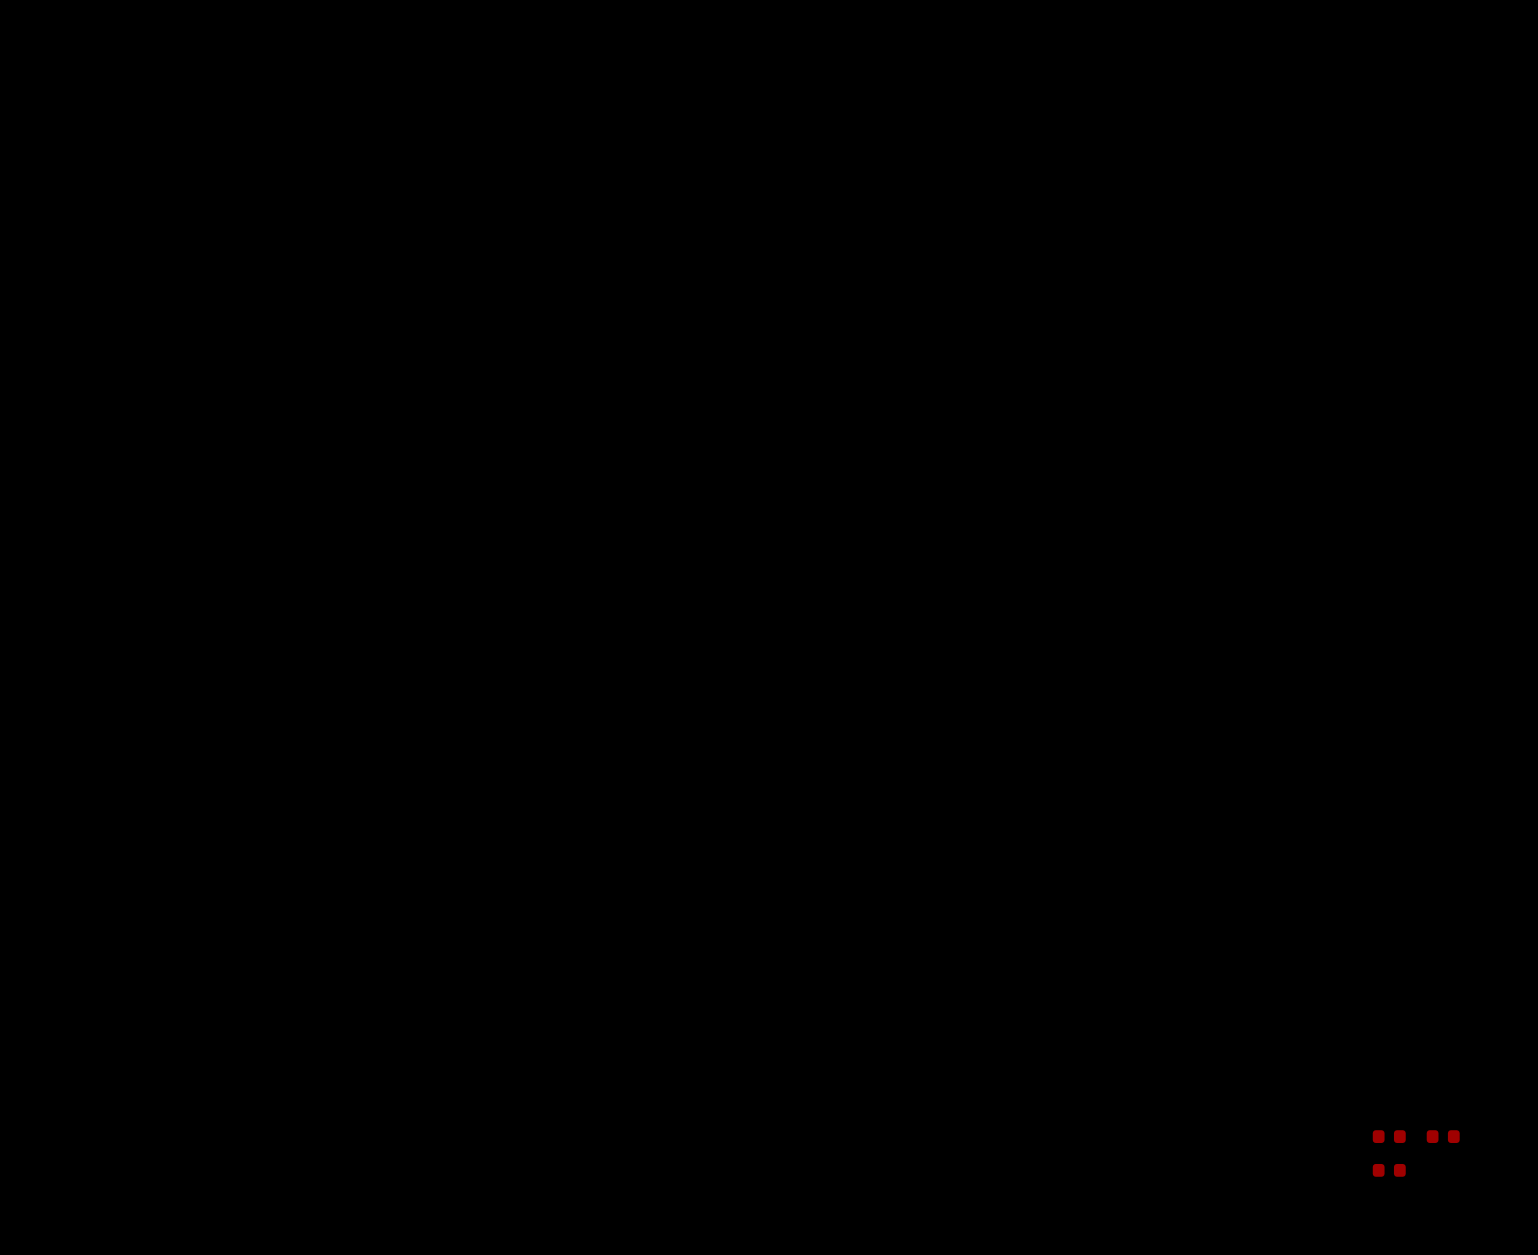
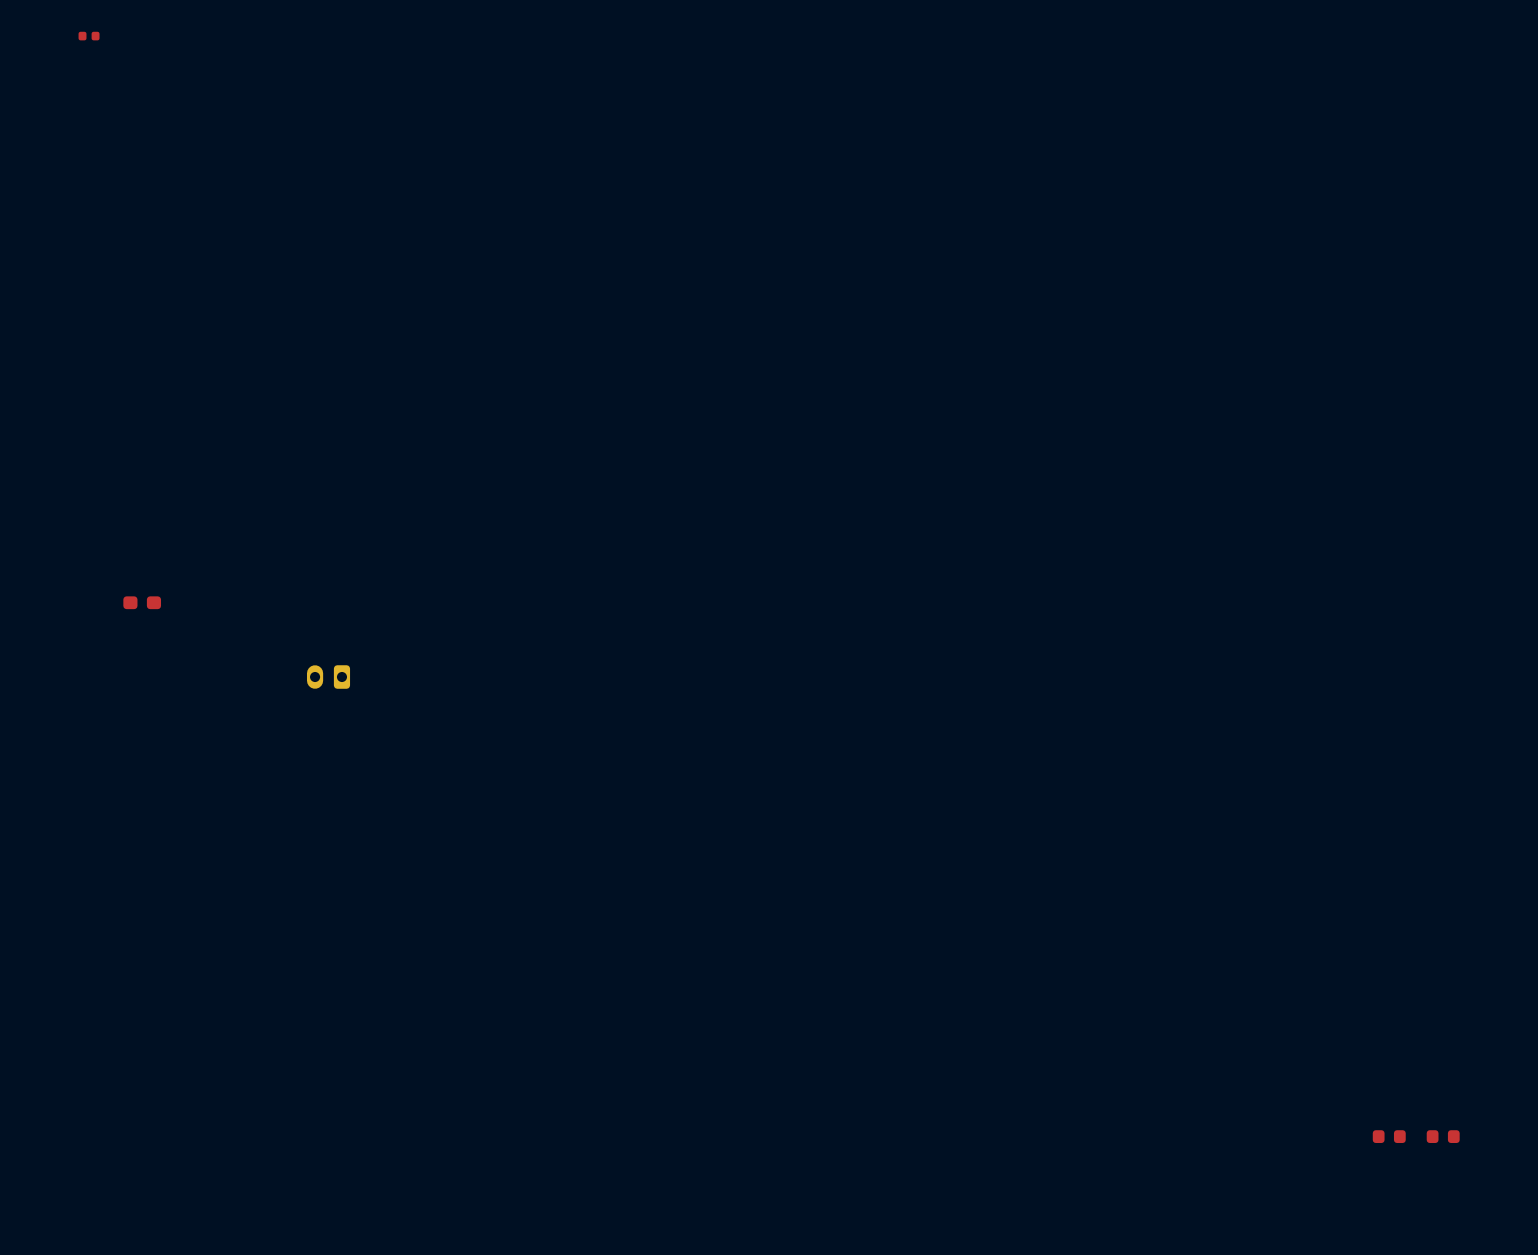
part: none -> (89, 36)
part: none -> (142, 602)
part: none -> (328, 677)
part: (1389, 1170) -> none

